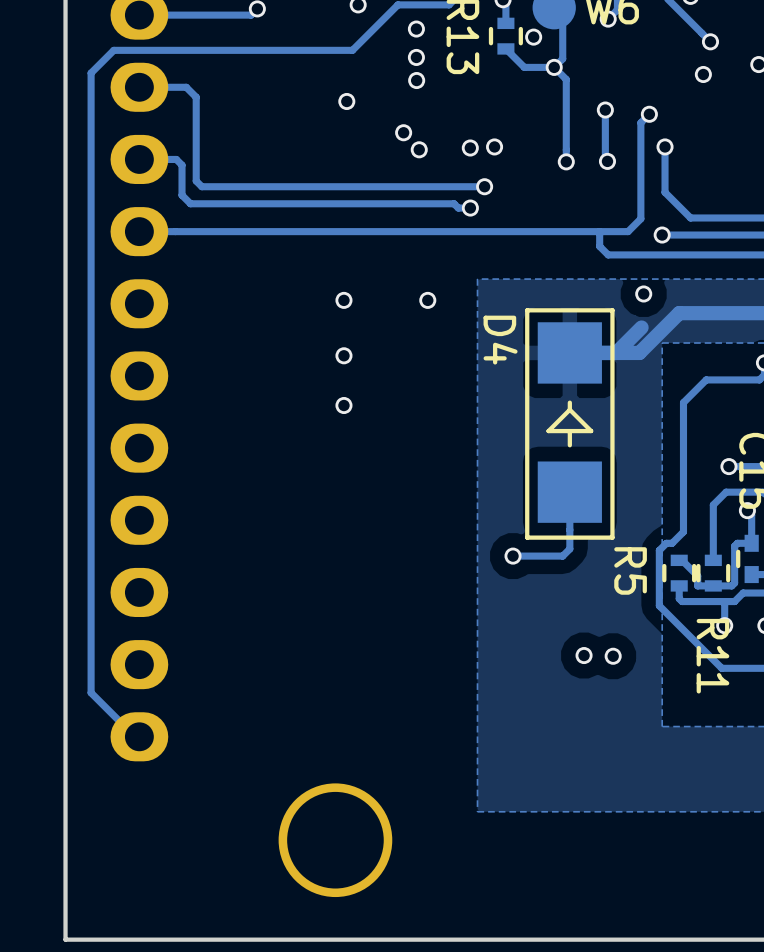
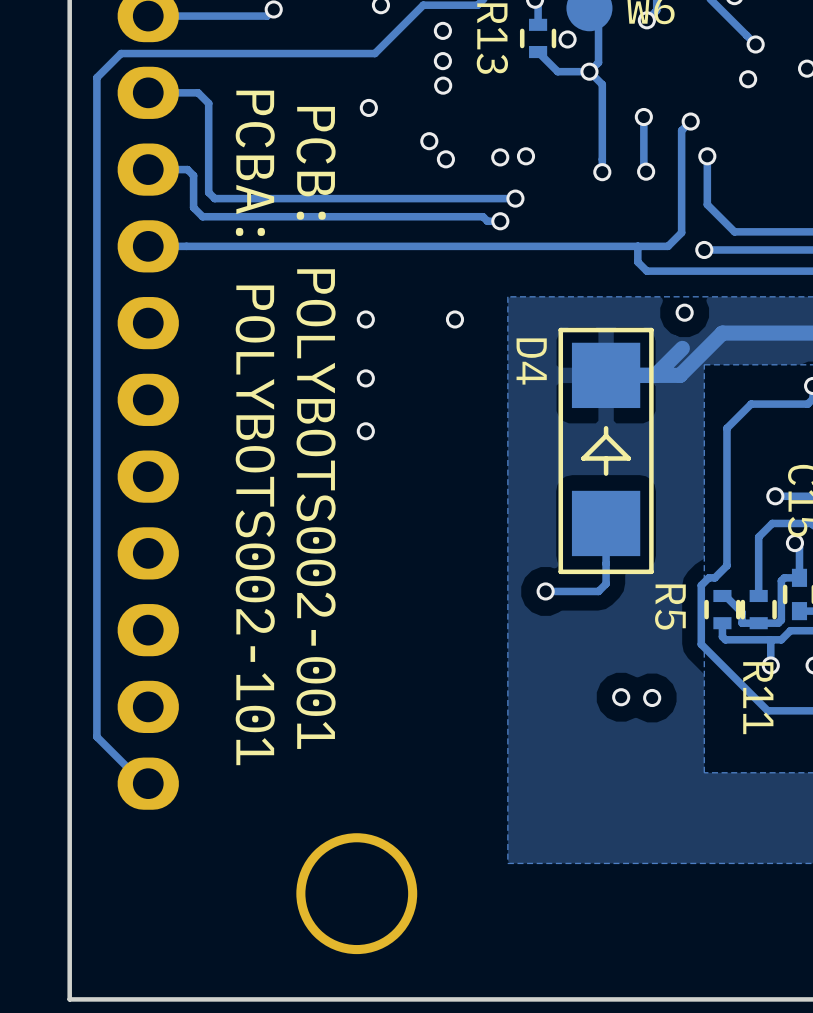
text: none -> PCBA: POLYBOTS002-101 (255, 427)
text: none -> PCB: POLYBOTS002-001 (316, 427)

